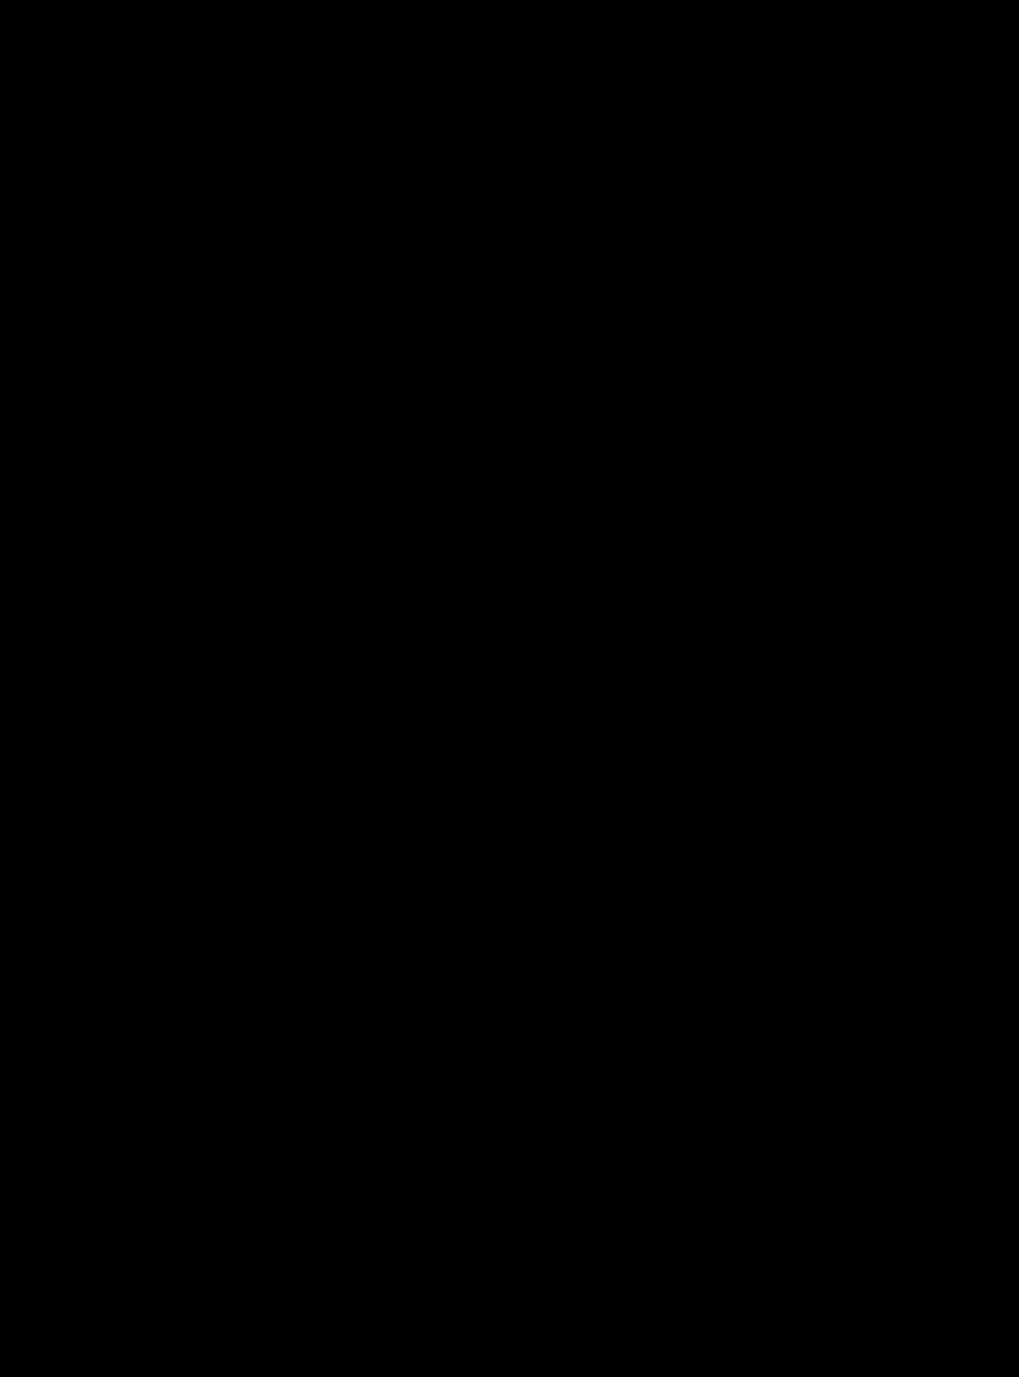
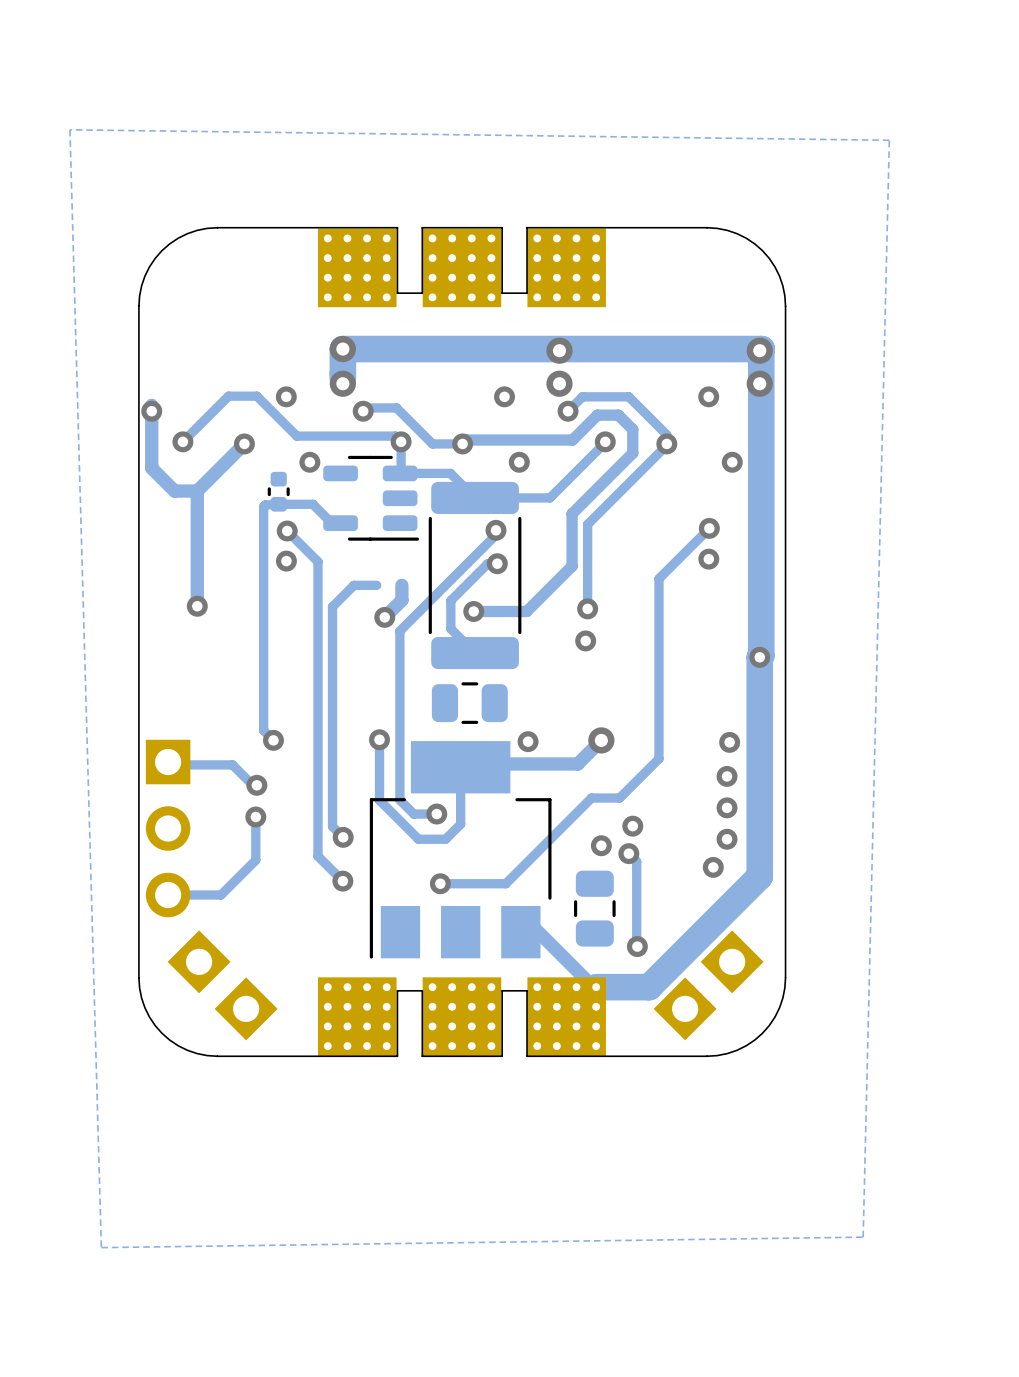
zone outline: none -> (69, 129) (889, 140) (863, 1237) (101, 1247) (69, 129)
board edge: none -> (707, 227) (527, 227) (527, 293) (502, 293) (502, 227) (422, 227) (422, 293) (397, 293) (397, 227) (207, 228) (178, 238) (161, 250) (149, 266) (141, 285) (138, 306) (138, 977) (141, 998) (149, 1017) (161, 1033) (178, 1045) (197, 1053) (217, 1056) (397, 1056) (397, 990) (422, 990) (422, 1056) (502, 1056) (502, 990) (527, 990) (527, 1056) (717, 1055) (737, 1050) (754, 1040) (775, 1017) (782, 998) (785, 977) (784, 296) (775, 266) (754, 243) (727, 230) (707, 227)
part: none -> (461, 267)
via: none -> (342, 349)
via: none -> (559, 350)
via: none -> (759, 350)
track: none -> (342, 379) (342, 349) (761, 349) (759, 876) (649, 987) (596, 987)
via: none -> (342, 383)
via: none -> (559, 383)
via: none -> (759, 383)
via: none -> (286, 396)
via: none -> (504, 396)
via: none -> (708, 396)
track: none -> (151, 405) (151, 468) (174, 491) (197, 491)
track: none -> (363, 407) (396, 407) (432, 443) (462, 443) (466, 440) (572, 440) (597, 415) (618, 415) (632, 429) (632, 453) (572, 513) (572, 566) (526, 611) (473, 611)
via: none -> (151, 411)
via: none -> (363, 411)
track: none -> (568, 411) (582, 396) (628, 396) (666, 434) (666, 445) (587, 524) (587, 608)
via: none -> (568, 411)
via: none -> (182, 441)
via: none -> (401, 441)
track: none -> (605, 441) (550, 497) (475, 497) (450, 473) (400, 473) (401, 441) (395, 436) (296, 436) (256, 396) (228, 396) (182, 441)
via: none -> (605, 441)
track: none -> (244, 443) (197, 491)
via: none -> (244, 443)
via: none -> (462, 443)
via: none -> (666, 443)
via: none -> (309, 462)
via: none -> (519, 462)
via: none -> (732, 462)
track: none -> (197, 491) (197, 606)
part: none -> (278, 491)
part: none -> (371, 498)
track: none -> (340, 523) (331, 523) (312, 504) (265, 504) (263, 506) (263, 730) (273, 740)
track: none -> (709, 528) (658, 578) (658, 758) (619, 798) (591, 798) (505, 883) (440, 883)
via: none -> (709, 528)
track: none -> (287, 530) (317, 561) (317, 856) (342, 881)
via: none -> (287, 530)
track: none -> (496, 530) (496, 534) (399, 631) (399, 800) (413, 814) (436, 814)
via: none -> (496, 530)
via: none -> (708, 559)
via: none -> (286, 561)
track: none -> (497, 563) (487, 563) (450, 600) (450, 628) (475, 653)
via: none -> (497, 563)
part: none -> (475, 575)
track: none -> (376, 585) (353, 585) (332, 606) (332, 826) (343, 837)
track: none -> (401, 585) (401, 600) (384, 617)
via: none -> (197, 606)
via: none -> (587, 608)
via: none -> (473, 611)
via: none -> (384, 617)
via: none -> (585, 640)
via: none -> (759, 657)
part: none -> (469, 703)
track: none -> (379, 739) (379, 800) (418, 839) (445, 839) (460, 824) (460, 767) (464, 763) (577, 763) (601, 740)
via: none -> (379, 739)
via: none -> (273, 740)
via: none -> (601, 740)
via: none -> (528, 741)
via: none -> (729, 742)
track: none -> (168, 762) (170, 764) (232, 764) (252, 785)
via: none -> (727, 776)
via: none -> (256, 785)
via: none -> (727, 807)
via: none -> (436, 814)
track: none -> (255, 816) (255, 860) (221, 895) (168, 895)
via: none -> (255, 816)
via: none -> (632, 826)
part: none -> (168, 828)
via: none -> (343, 837)
via: none -> (727, 839)
via: none -> (601, 845)
part: none -> (460, 849)
track: none -> (628, 853) (636, 861) (637, 946)
via: none -> (628, 853)
via: none -> (713, 867)
via: none -> (342, 881)
via: none -> (440, 883)
part: none -> (594, 908)
track: none -> (535, 928) (593, 987)
via: none -> (637, 946)
part: none -> (222, 985)
part: none -> (708, 985)
part: none -> (461, 1016)

